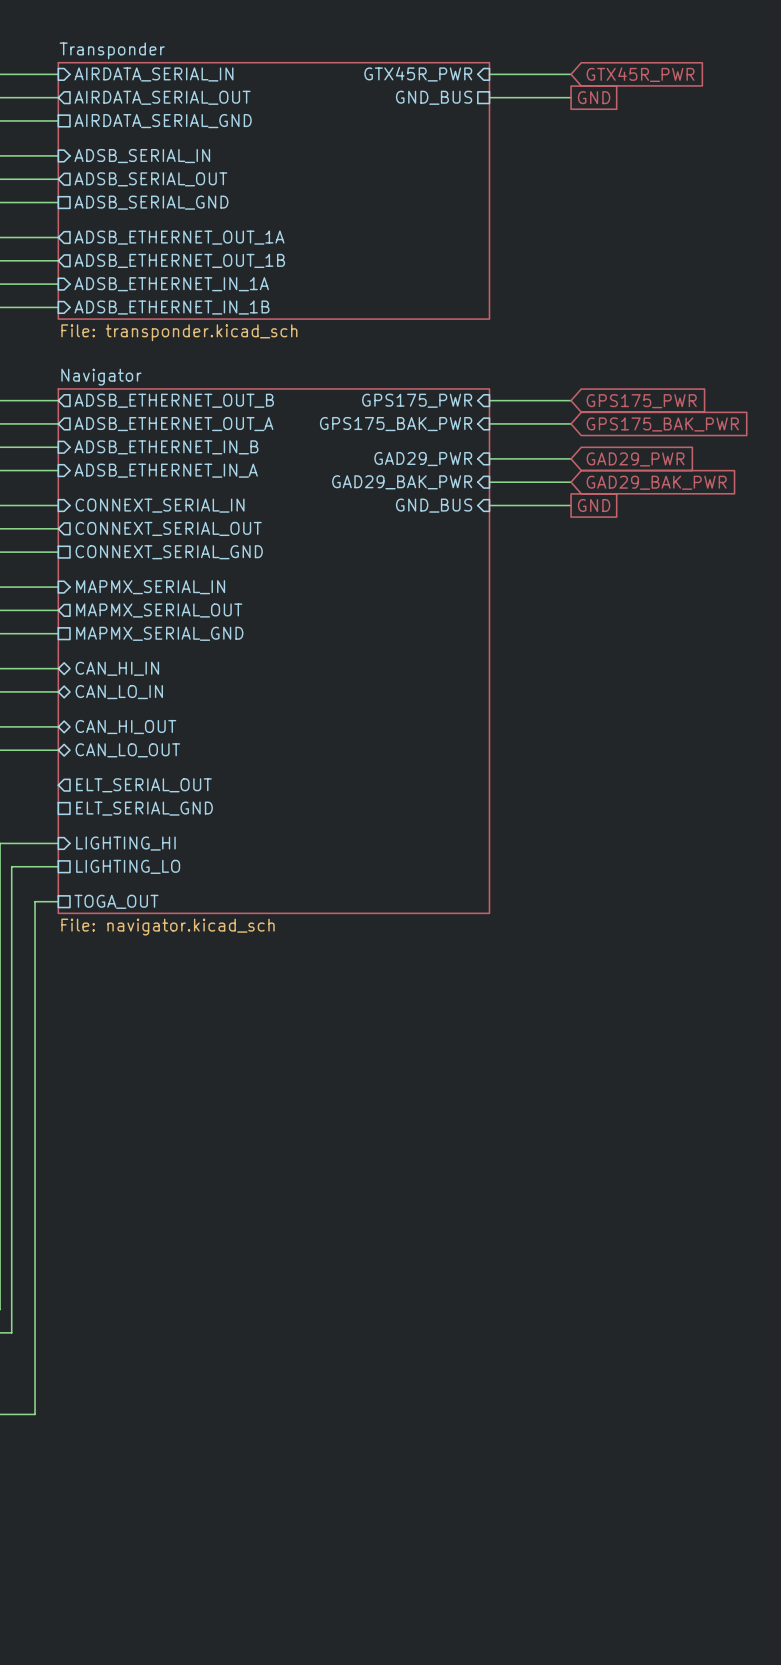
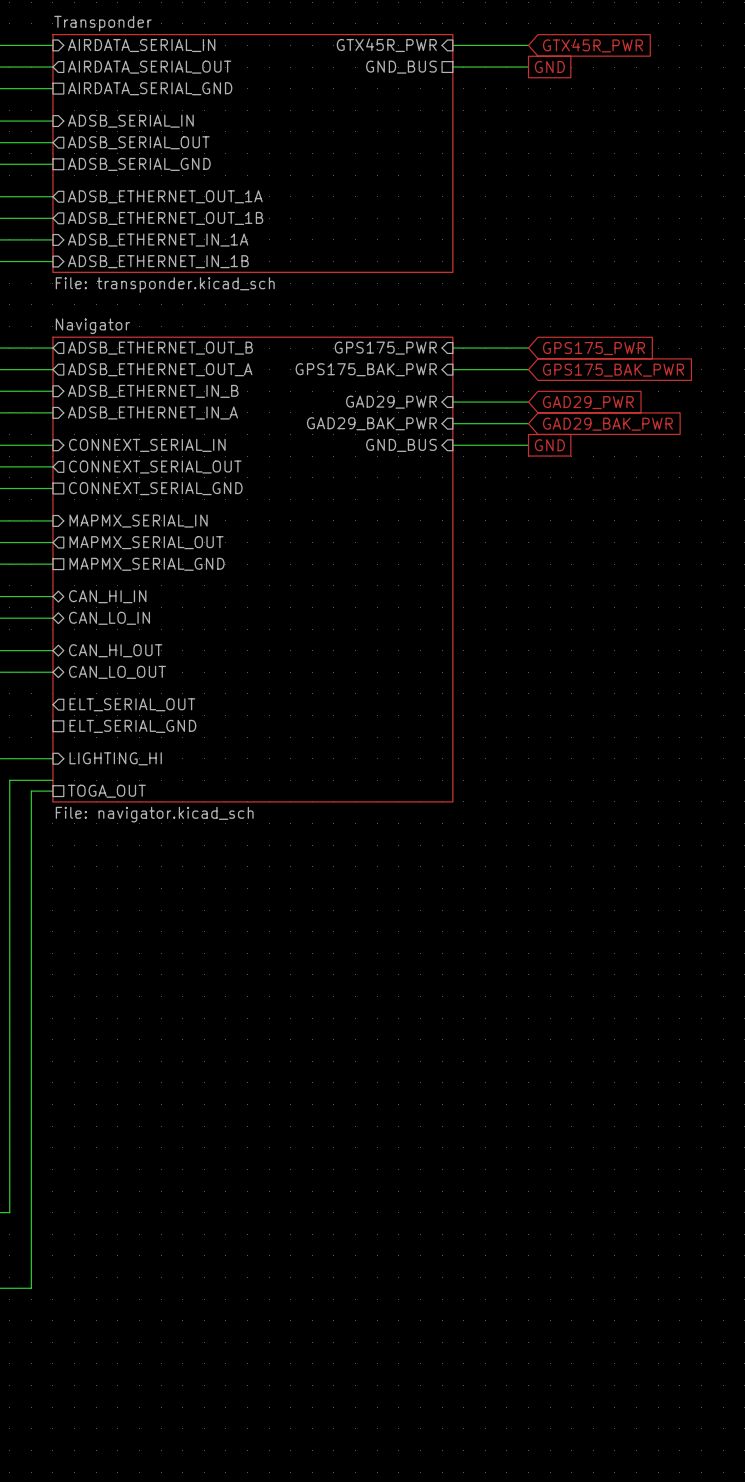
sheet Navigator: none -> File: navigator.kicad_sch (252, 569)
sheet Navigator: File: navigator.kicad_sch (273, 651) -> none
sheet pin: LIGHTING_LO (128, 866) -> none
wire: (35, 901) (58, 901) -> (31, 812) (31, 791) (52, 791)
sheet pin position: TOGA_OUT (116, 901) -> TOGA_OUT (106, 791)

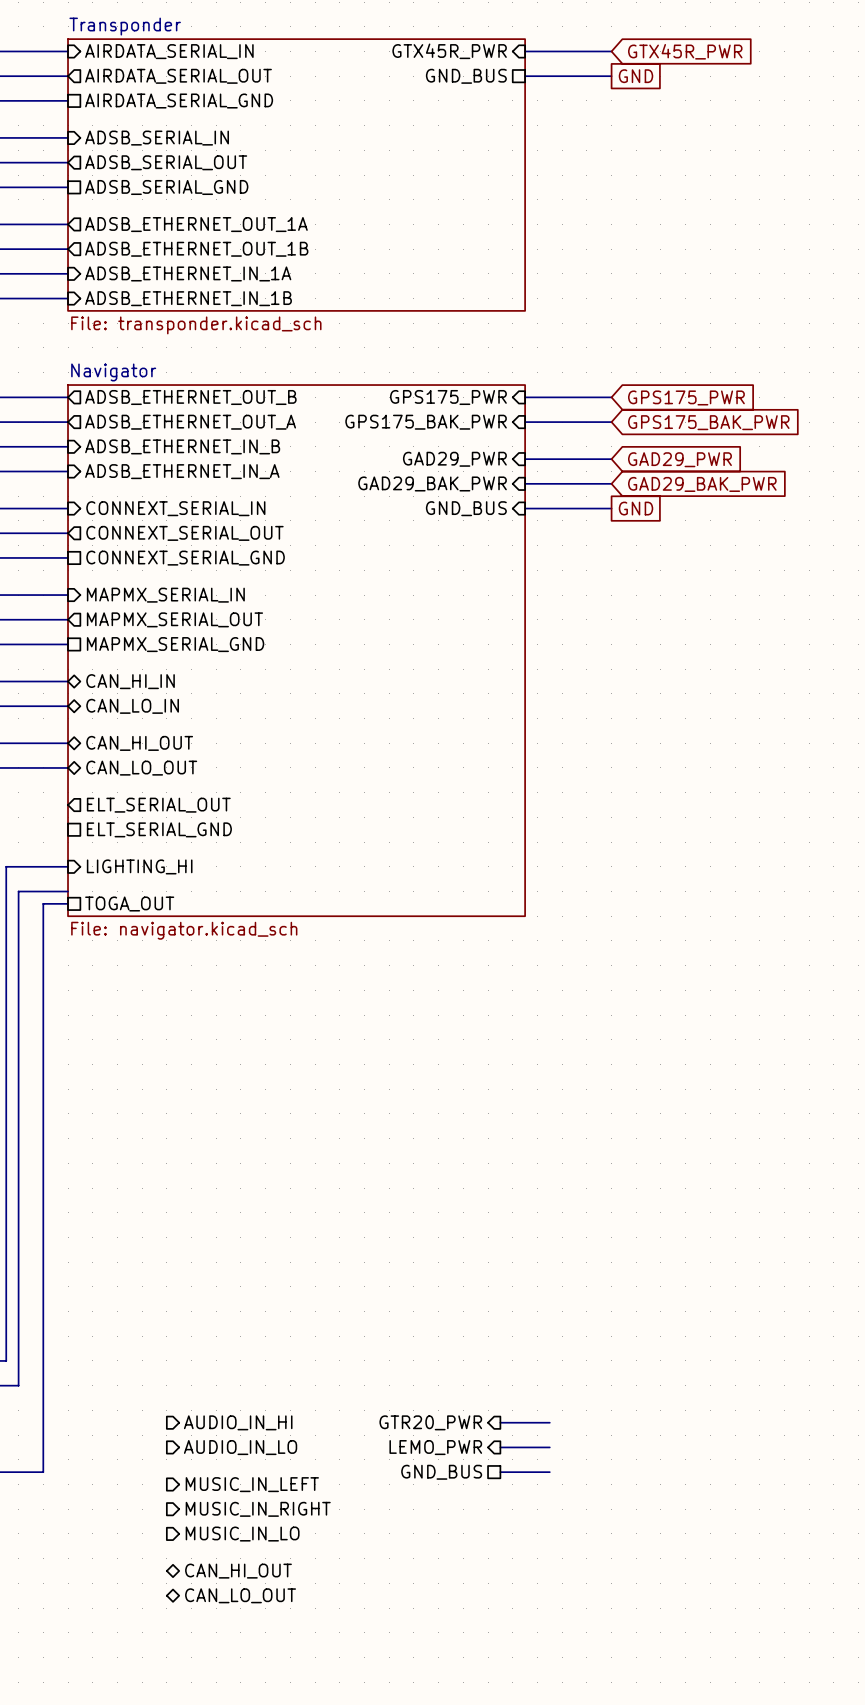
sheet pin: none -> AUDIO_IN_HI (238, 1422)
sheet pin: none -> GTR20_PWR (430, 1422)
wire: none -> (500, 1422) (549, 1422)
sheet pin: none -> AUDIO_IN_LO (240, 1447)
sheet pin: none -> LEMO_PWR (435, 1447)
wire: none -> (500, 1447) (549, 1447)
sheet pin: none -> GND_BUS (441, 1472)
wire: none -> (500, 1472) (549, 1472)
sheet pin: none -> MUSIC_IN_LEFT (252, 1484)
sheet pin: none -> MUSIC_IN_RIGHT (258, 1509)
sheet pin: none -> MUSIC_IN_LO (242, 1534)
sheet pin: none -> CAN_HI_OUT (238, 1571)
sheet pin: none -> CAN_LO_OUT (240, 1595)

